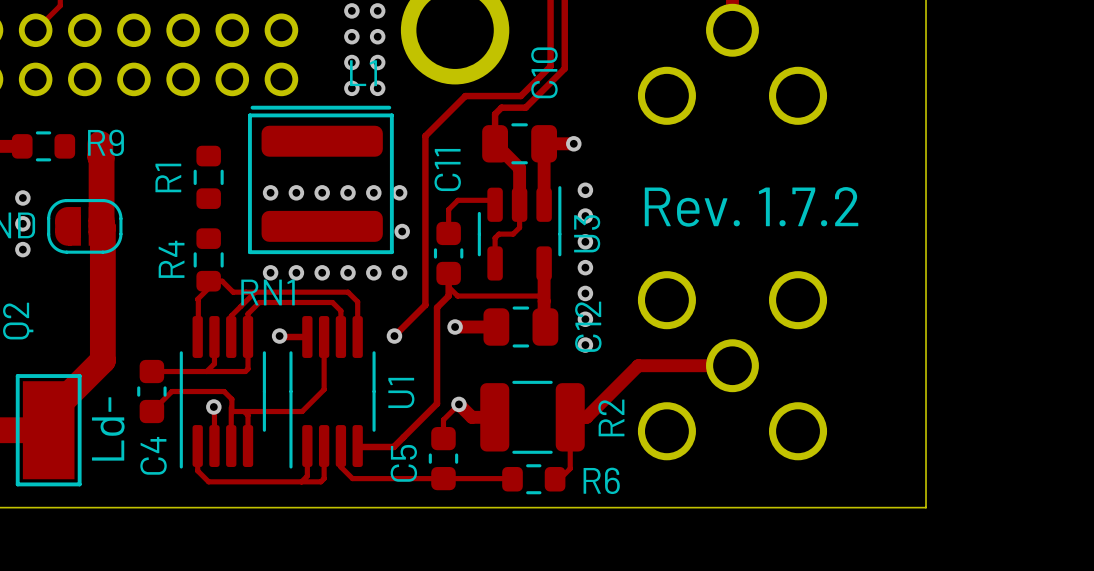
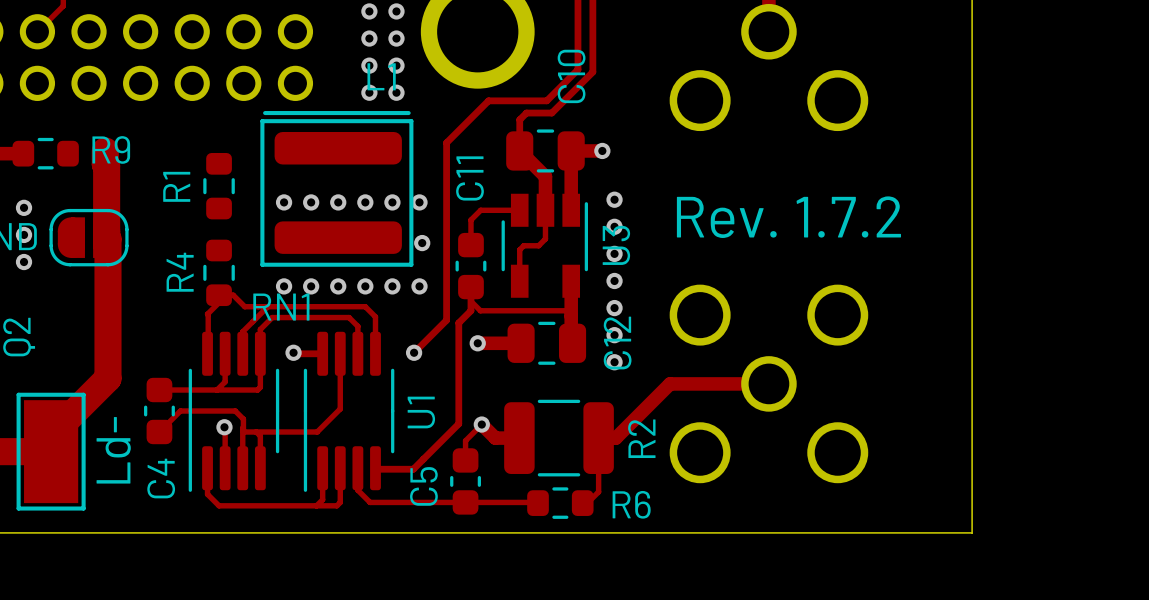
U3 footprint: [477, 186, 562, 281] -> [501, 193, 588, 298]

